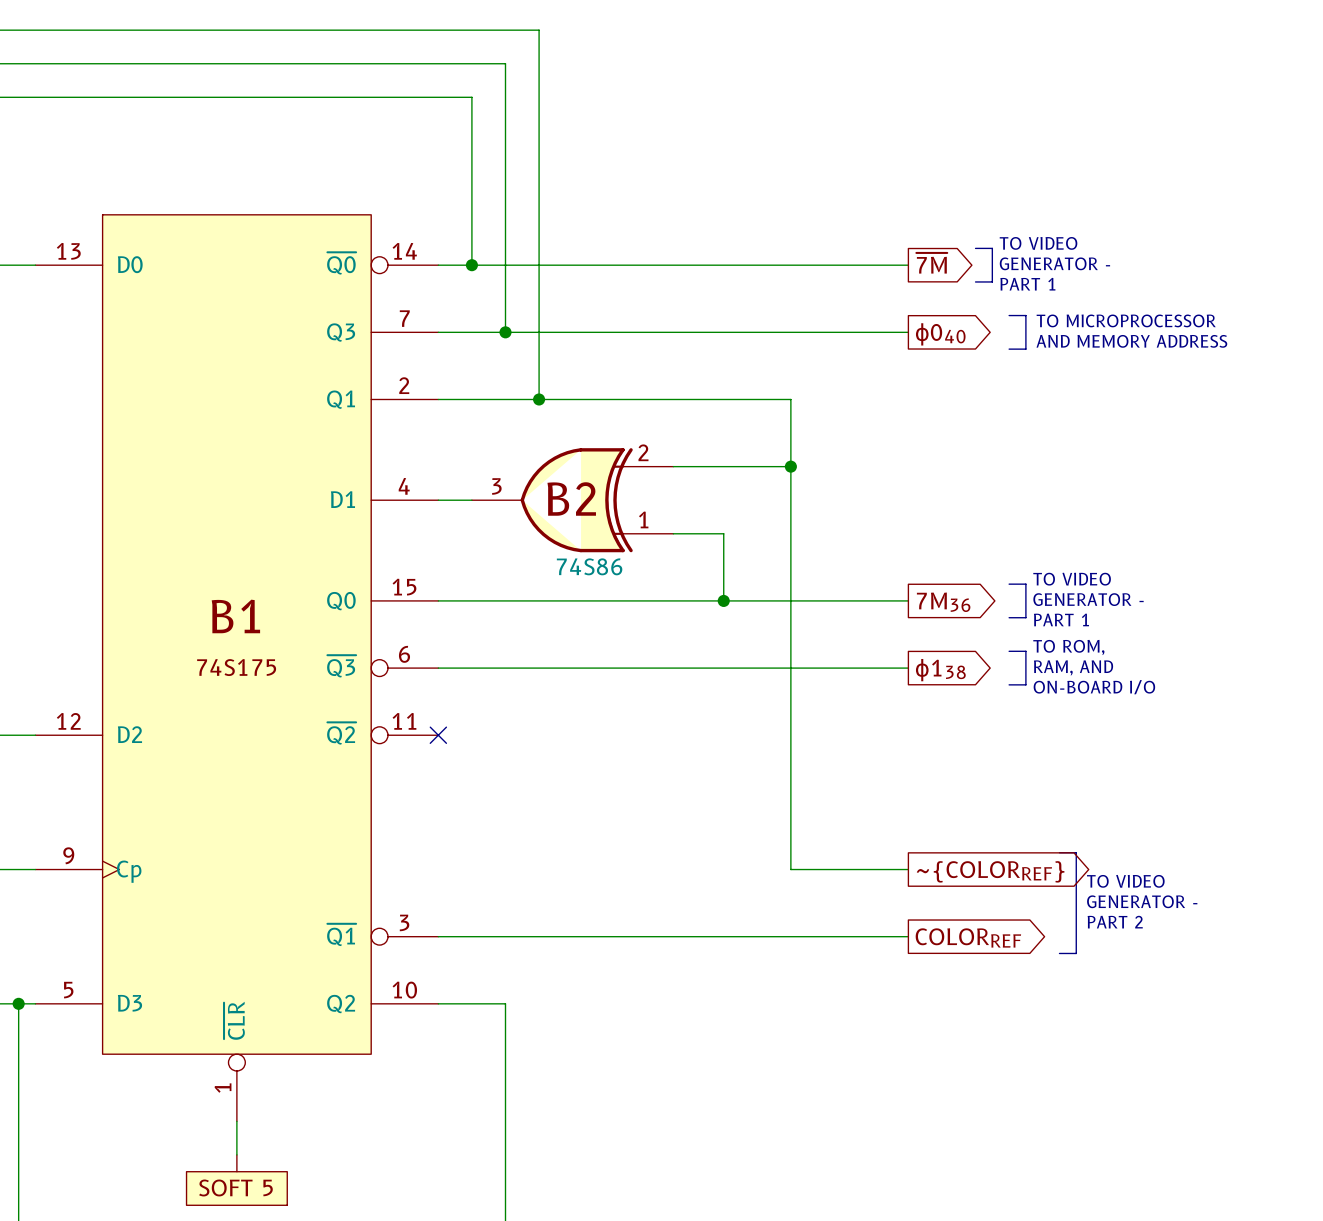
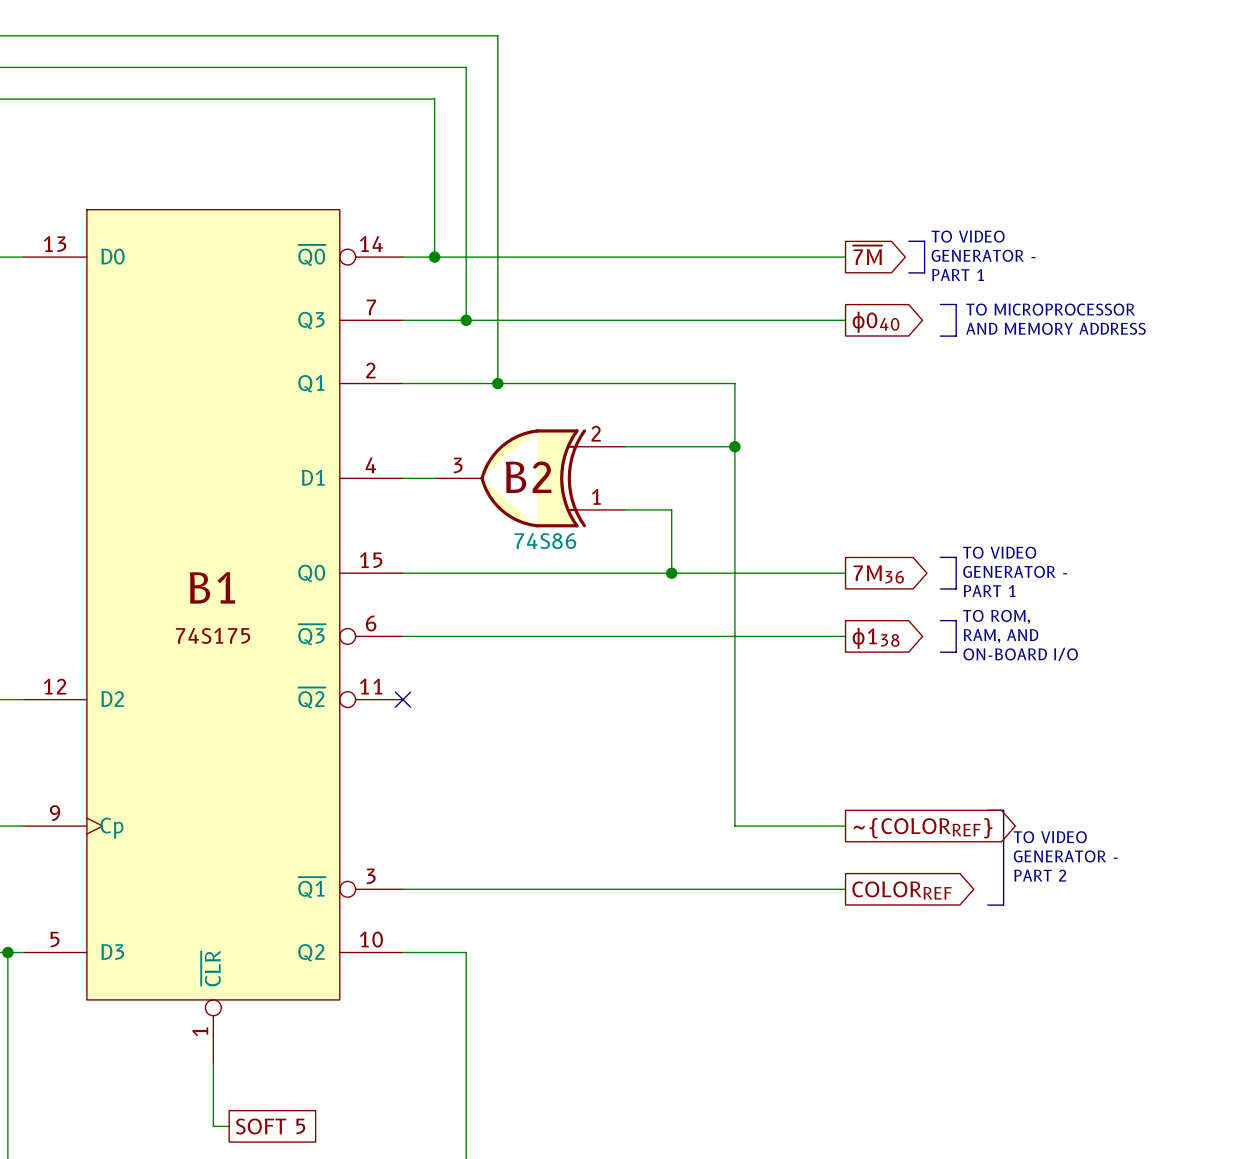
part: (236, 1180) -> none
global label: none -> SOFT 5 (270, 1126)

